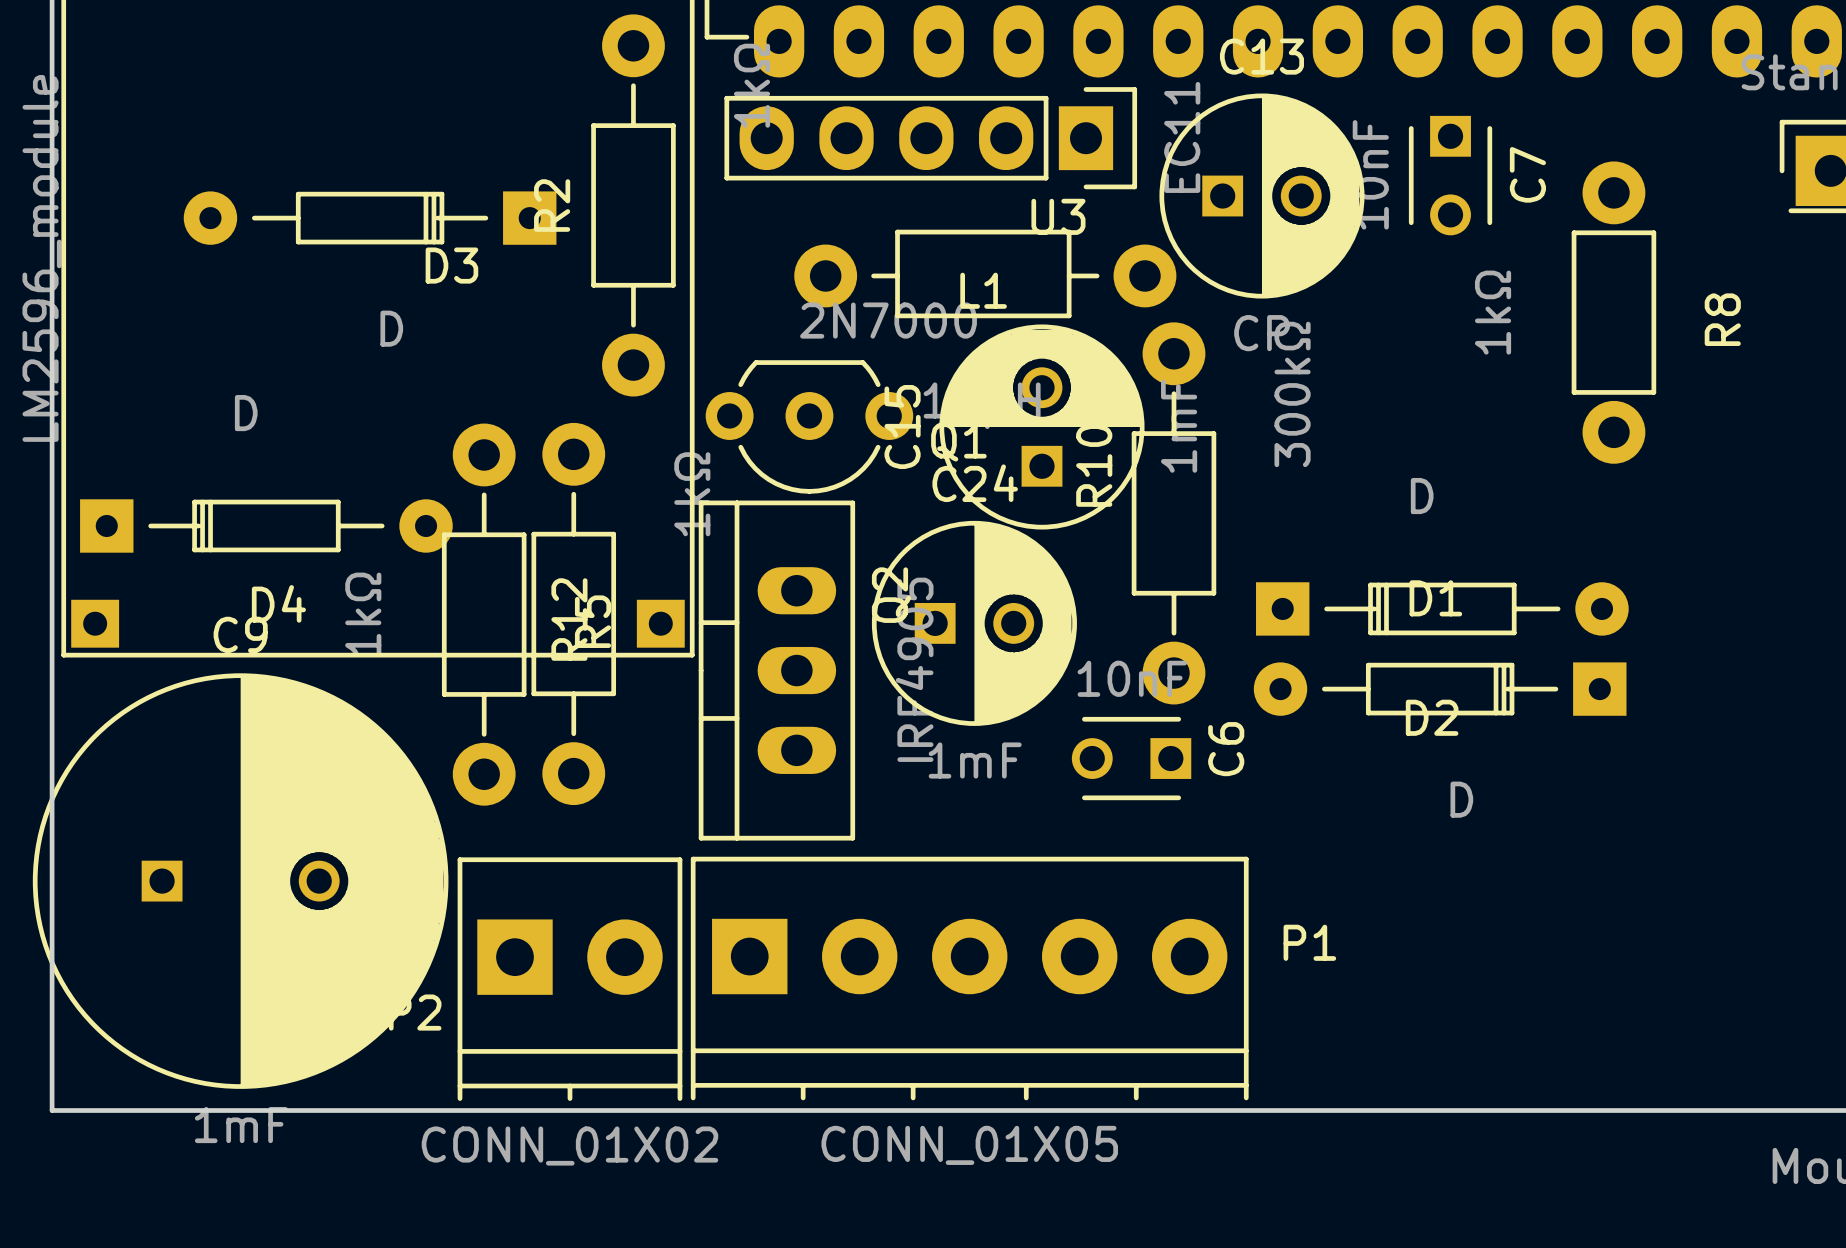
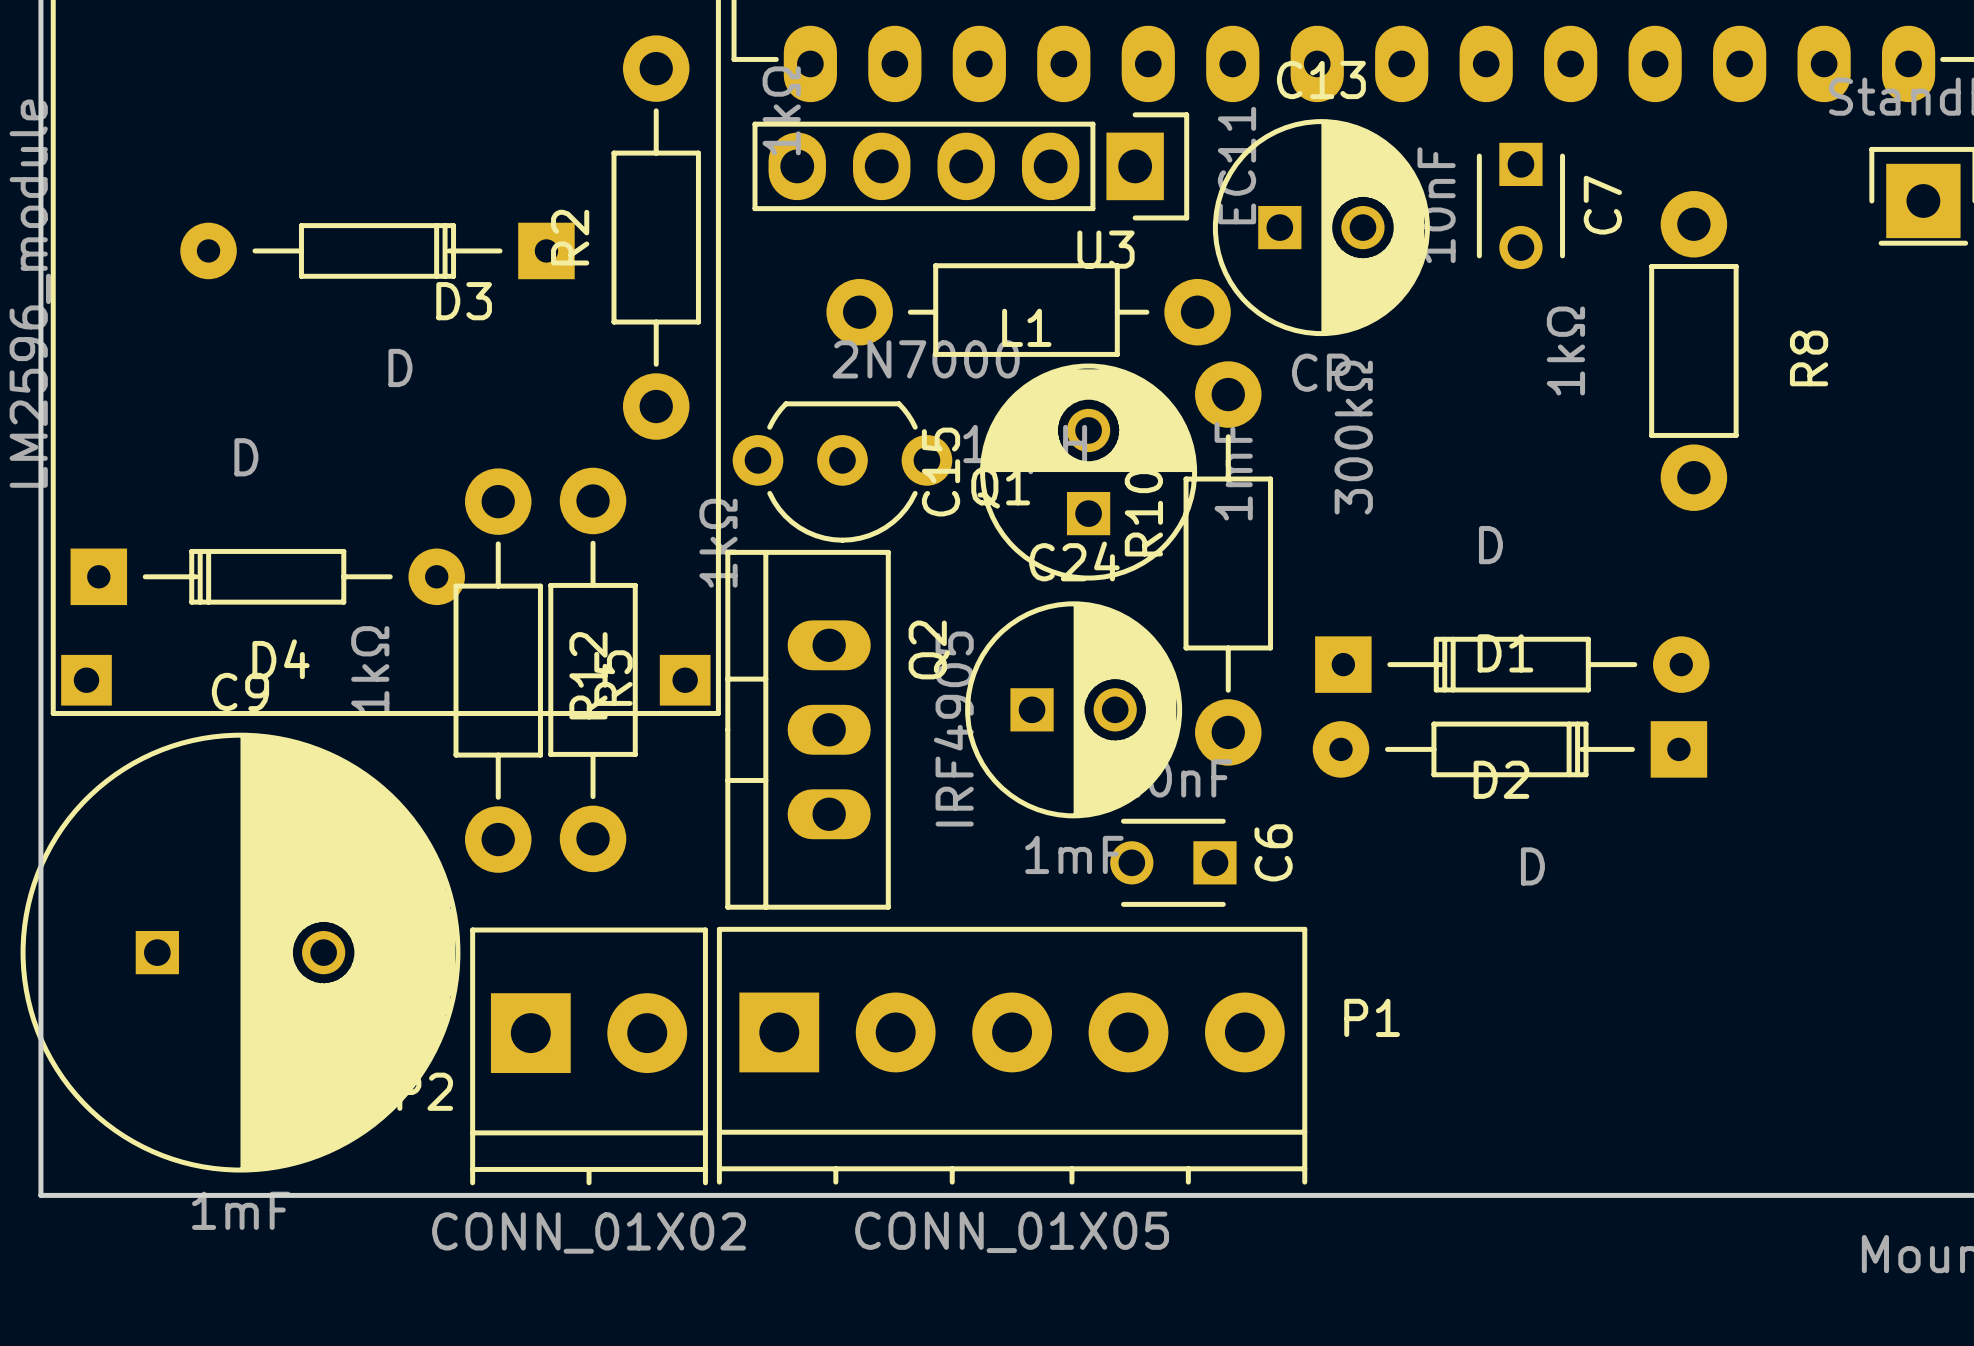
C24 position: (974, 623) -> (1073, 709)
C6 position: (1131, 758) -> (1173, 862)

